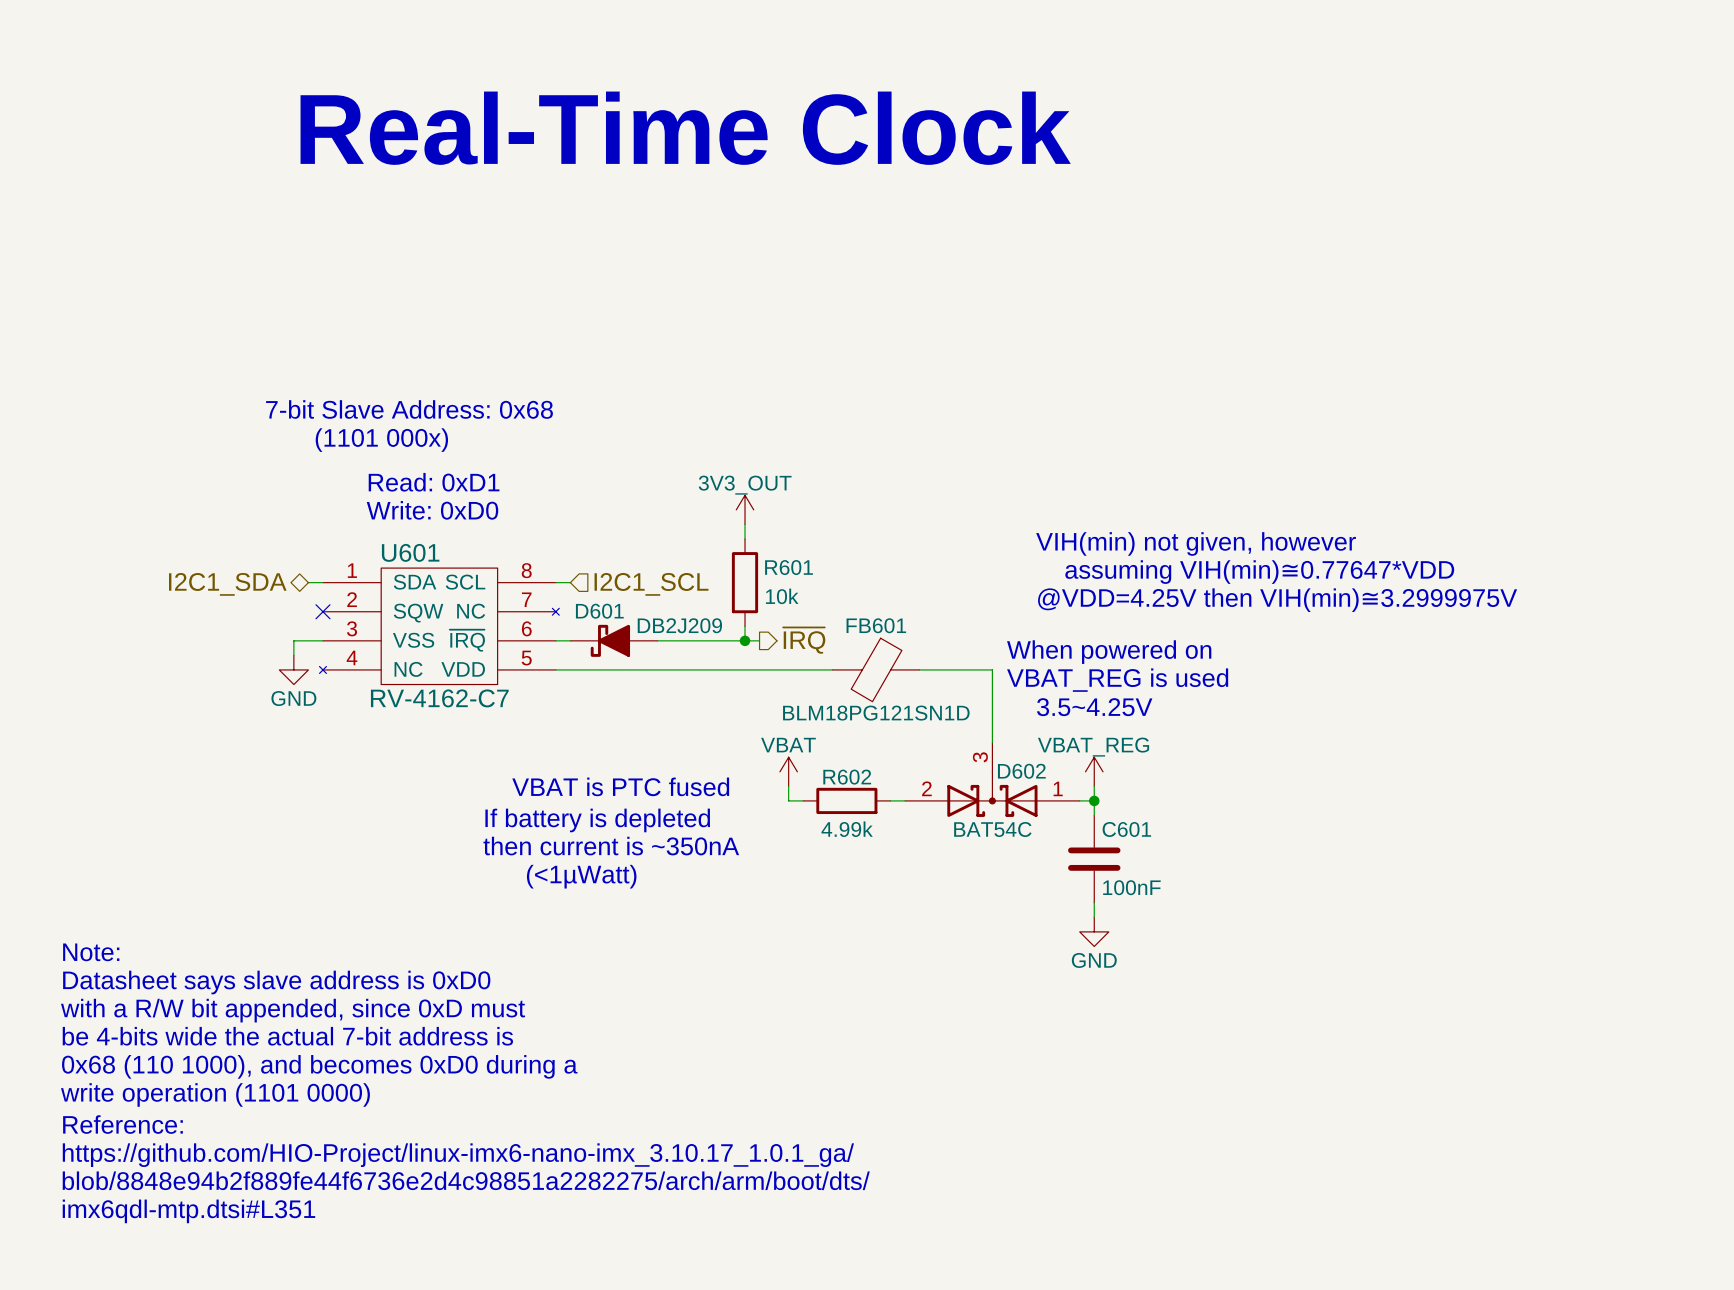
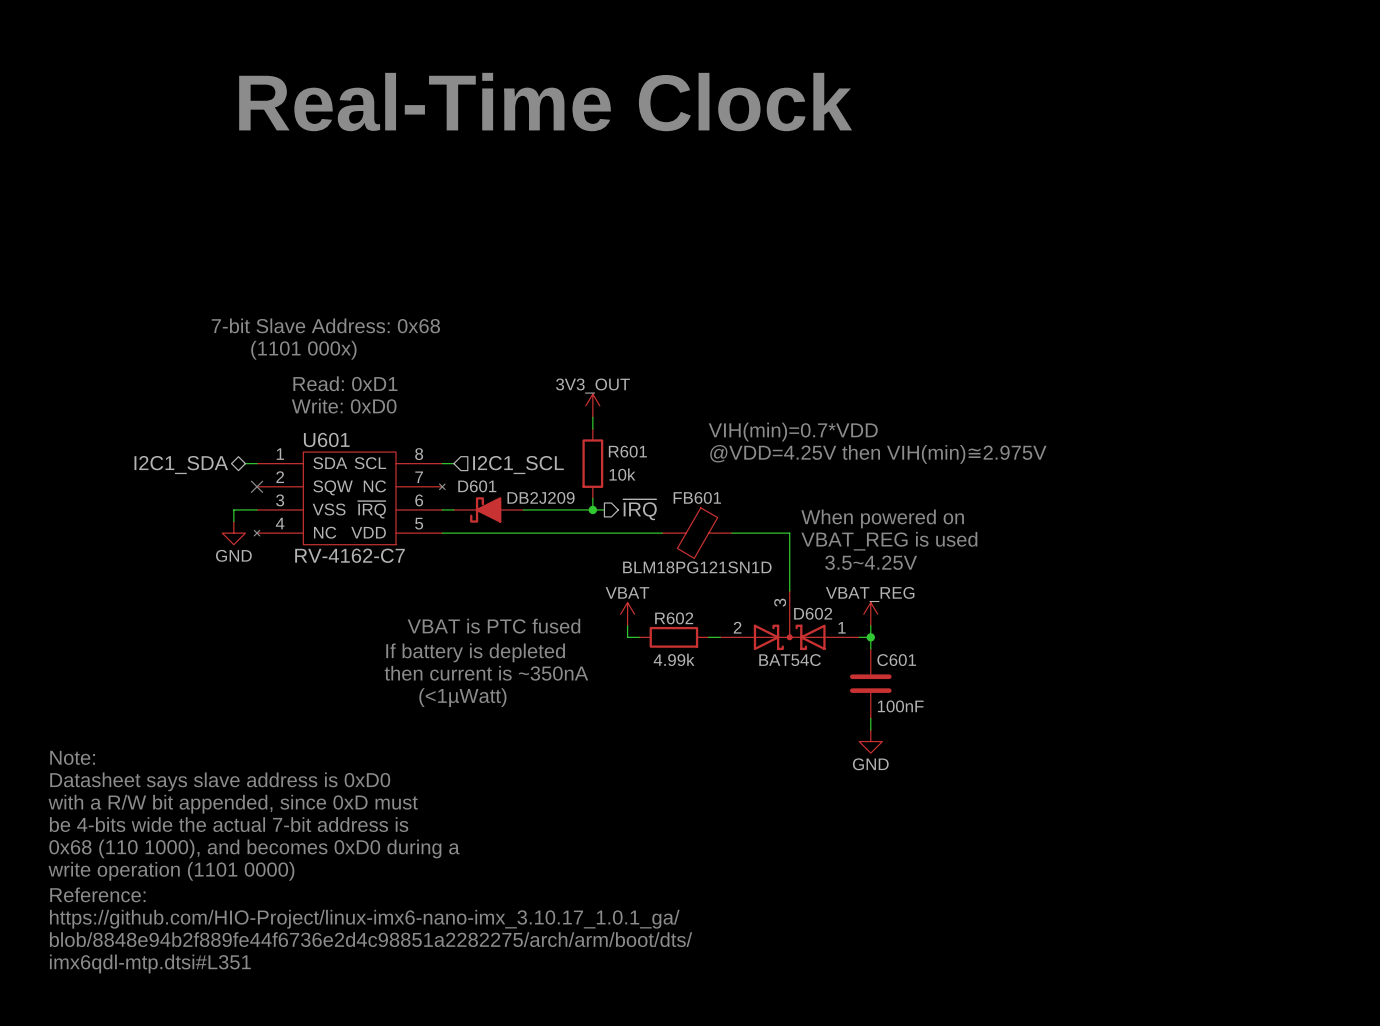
text: VIH(min) not given, however (1196, 543) -> none
text: assuming VIH(min)≅0.77647*VDD (1259, 572) -> VIH(min)=0.7*VDD (793, 432)
text: @VDD=4.25V then VIH(min)≅3.2999975V (1277, 600) -> @VDD=4.25V then VIH(min)≅2.975V (878, 454)

